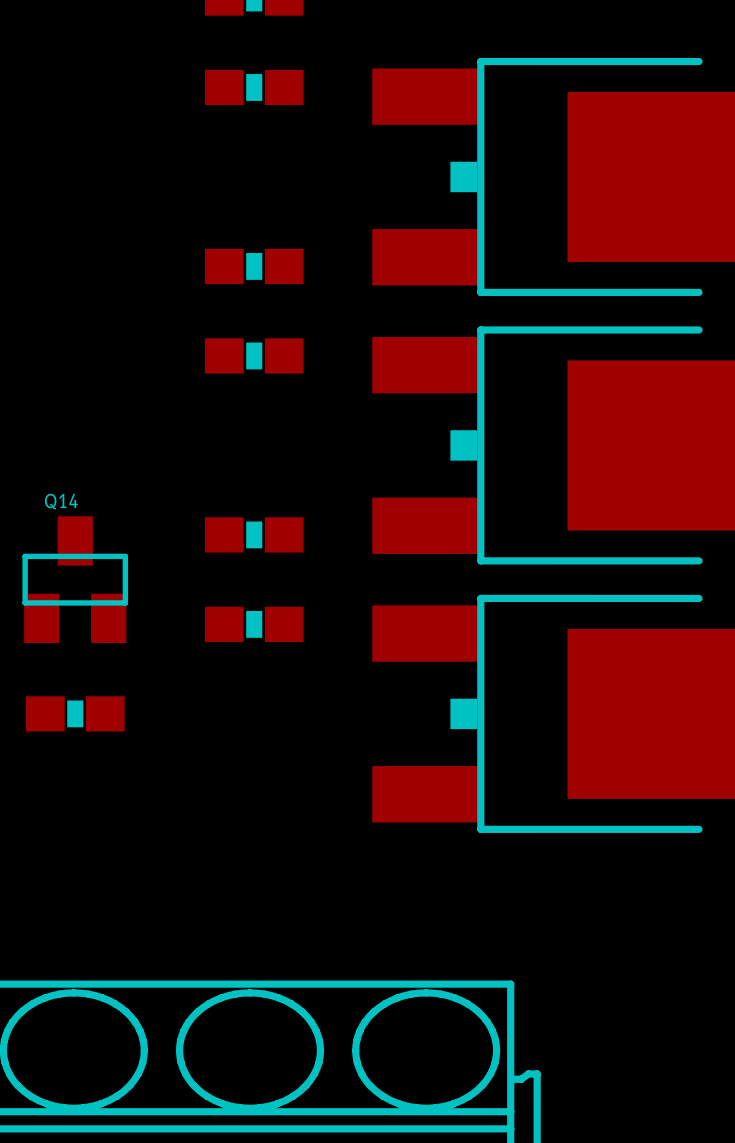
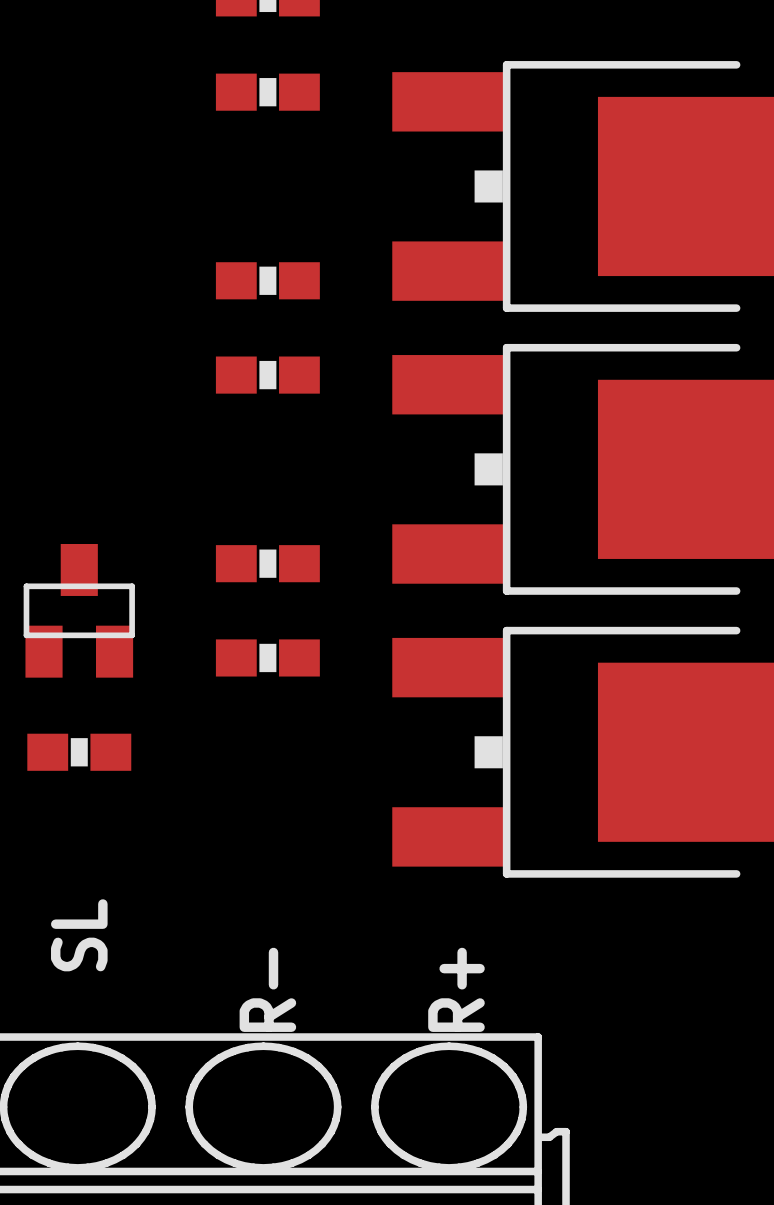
Q14 name: Q14 (61, 501) -> none
text: none -> SL (79, 935)
text: none -> R- (267, 989)
text: none -> R+ (456, 989)

